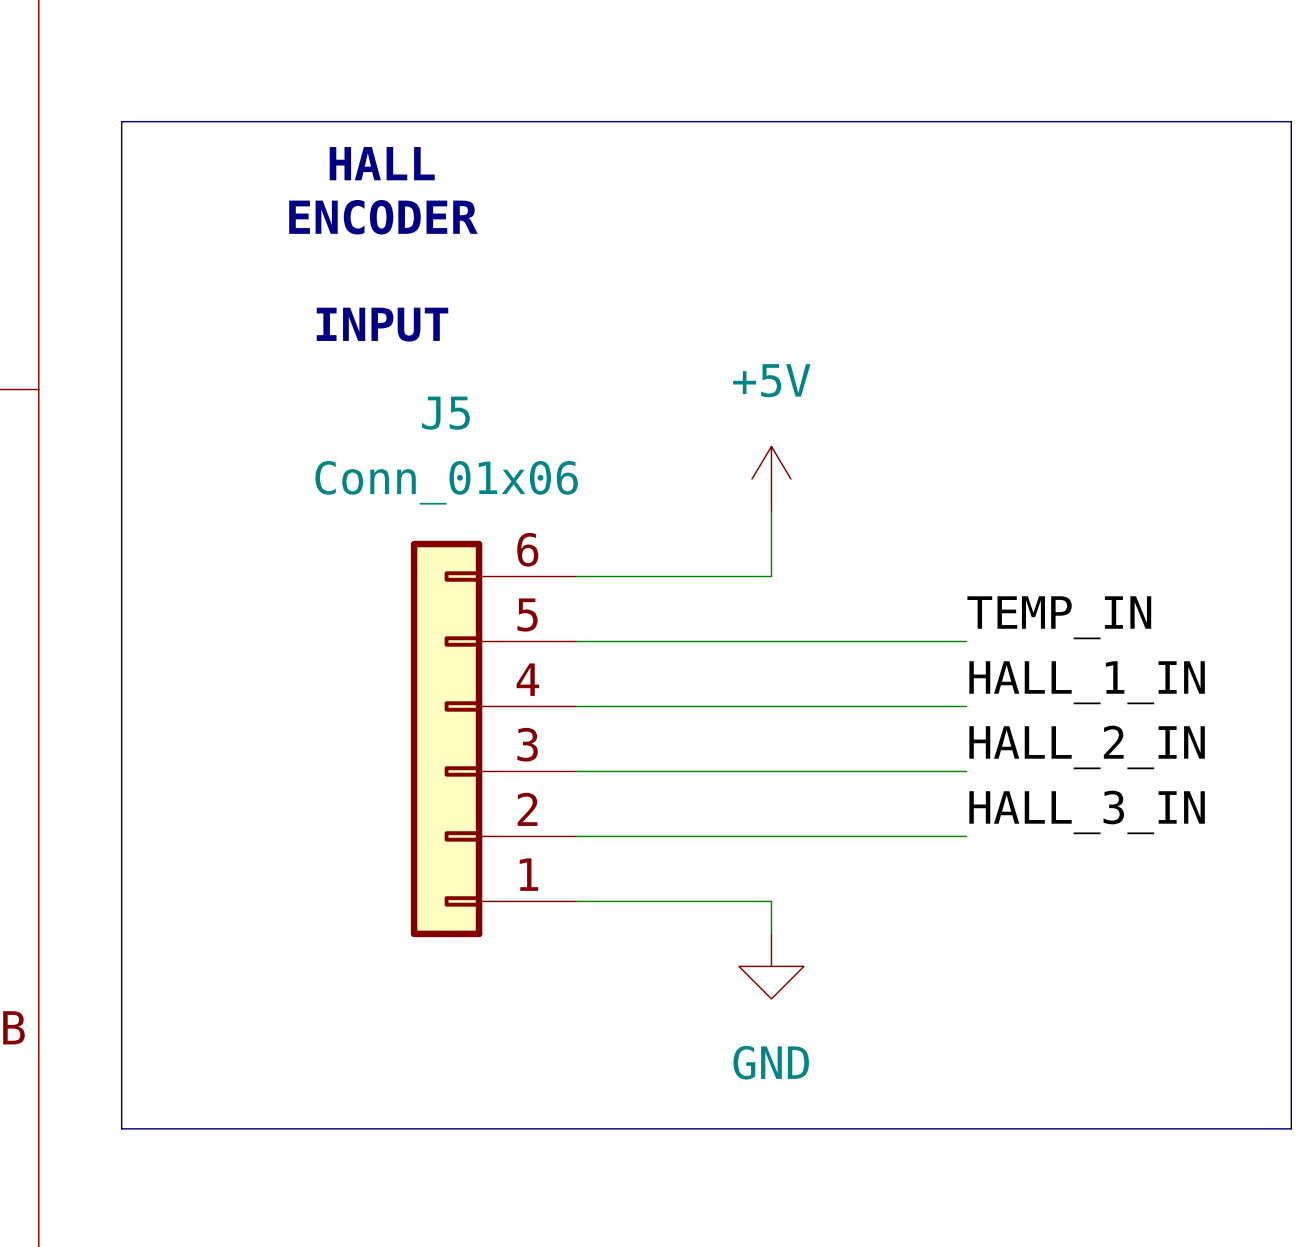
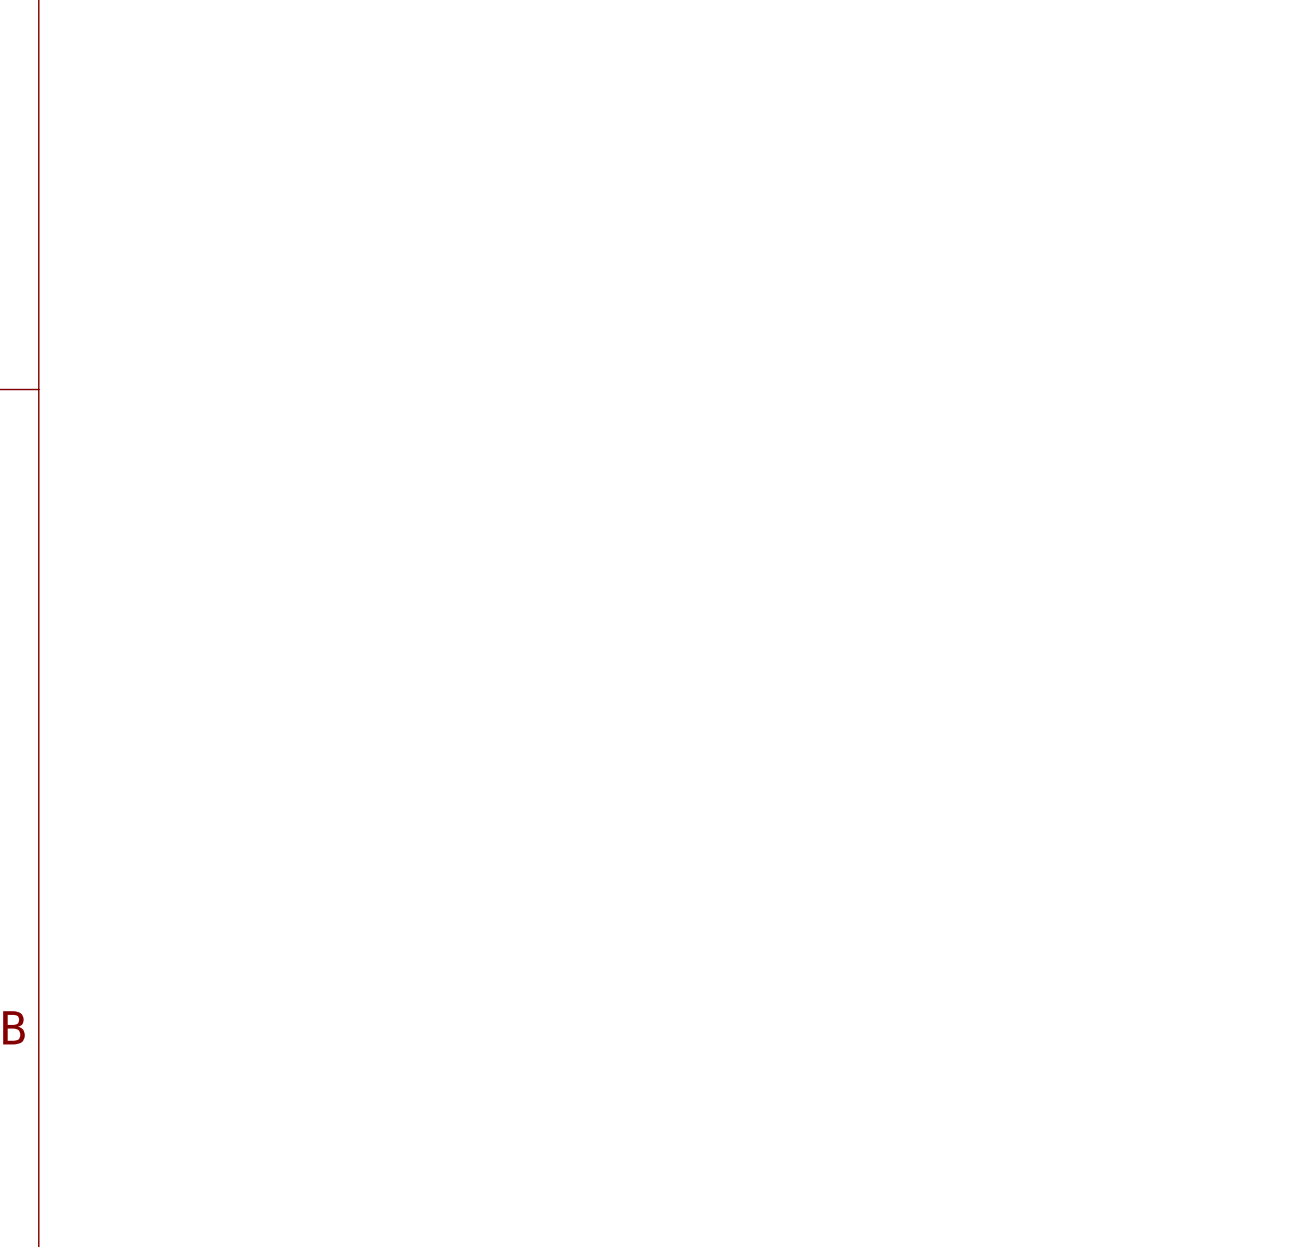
line: (121, 121) (1291, 121) (1291, 1128) (121, 1128) (121, 121) -> none
text: HALL (382, 163) -> none
text: ENCODER (383, 217) -> none
text: INPUT (382, 324) -> none
power symbol: +5V (771, 479) -> none
wire: (771, 511) (771, 576) (576, 576) -> none
label: TEMP_IN (1059, 617) -> none
wire: (576, 641) (966, 641) -> none
label: HALL_1_IN (1087, 682) -> none
wire: (576, 706) (966, 706) -> none
J5: Conn_01x06 (493, 738) -> none
label: HALL_2_IN (1087, 747) -> none
wire: (576, 771) (966, 771) -> none
label: HALL_3_IN (1087, 812) -> none
wire: (576, 836) (966, 836) -> none
wire: (576, 901) (771, 901) (771, 933) -> none
power symbol: GND (771, 966) -> none

